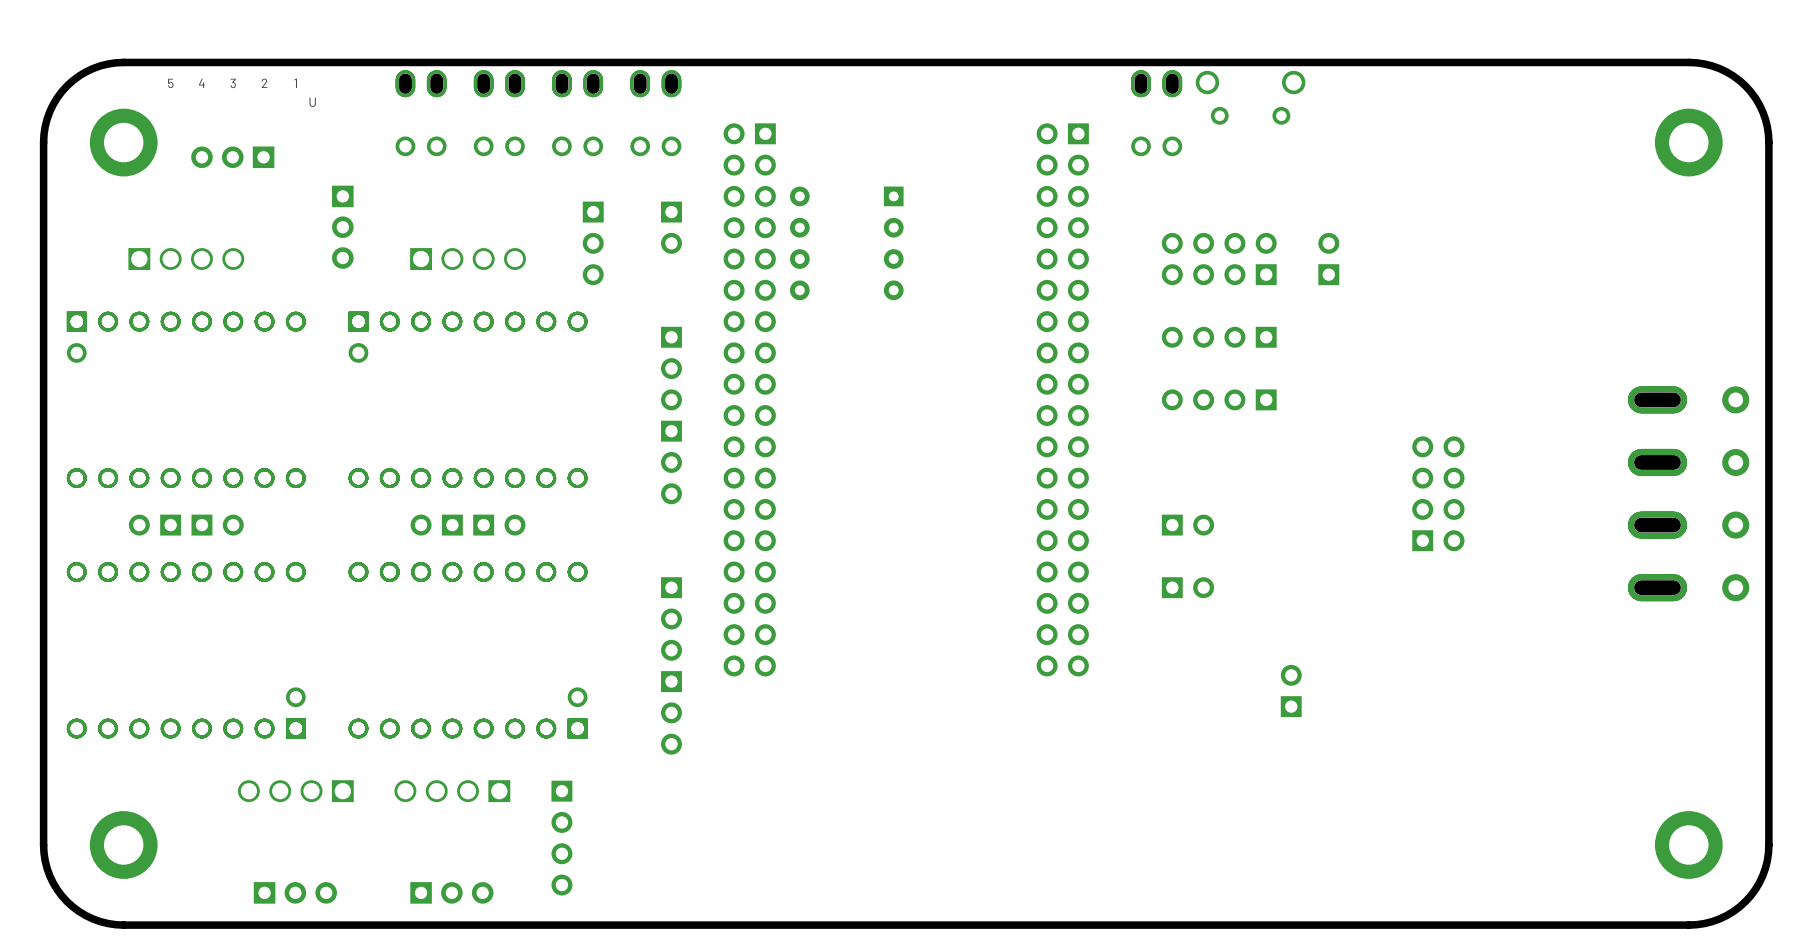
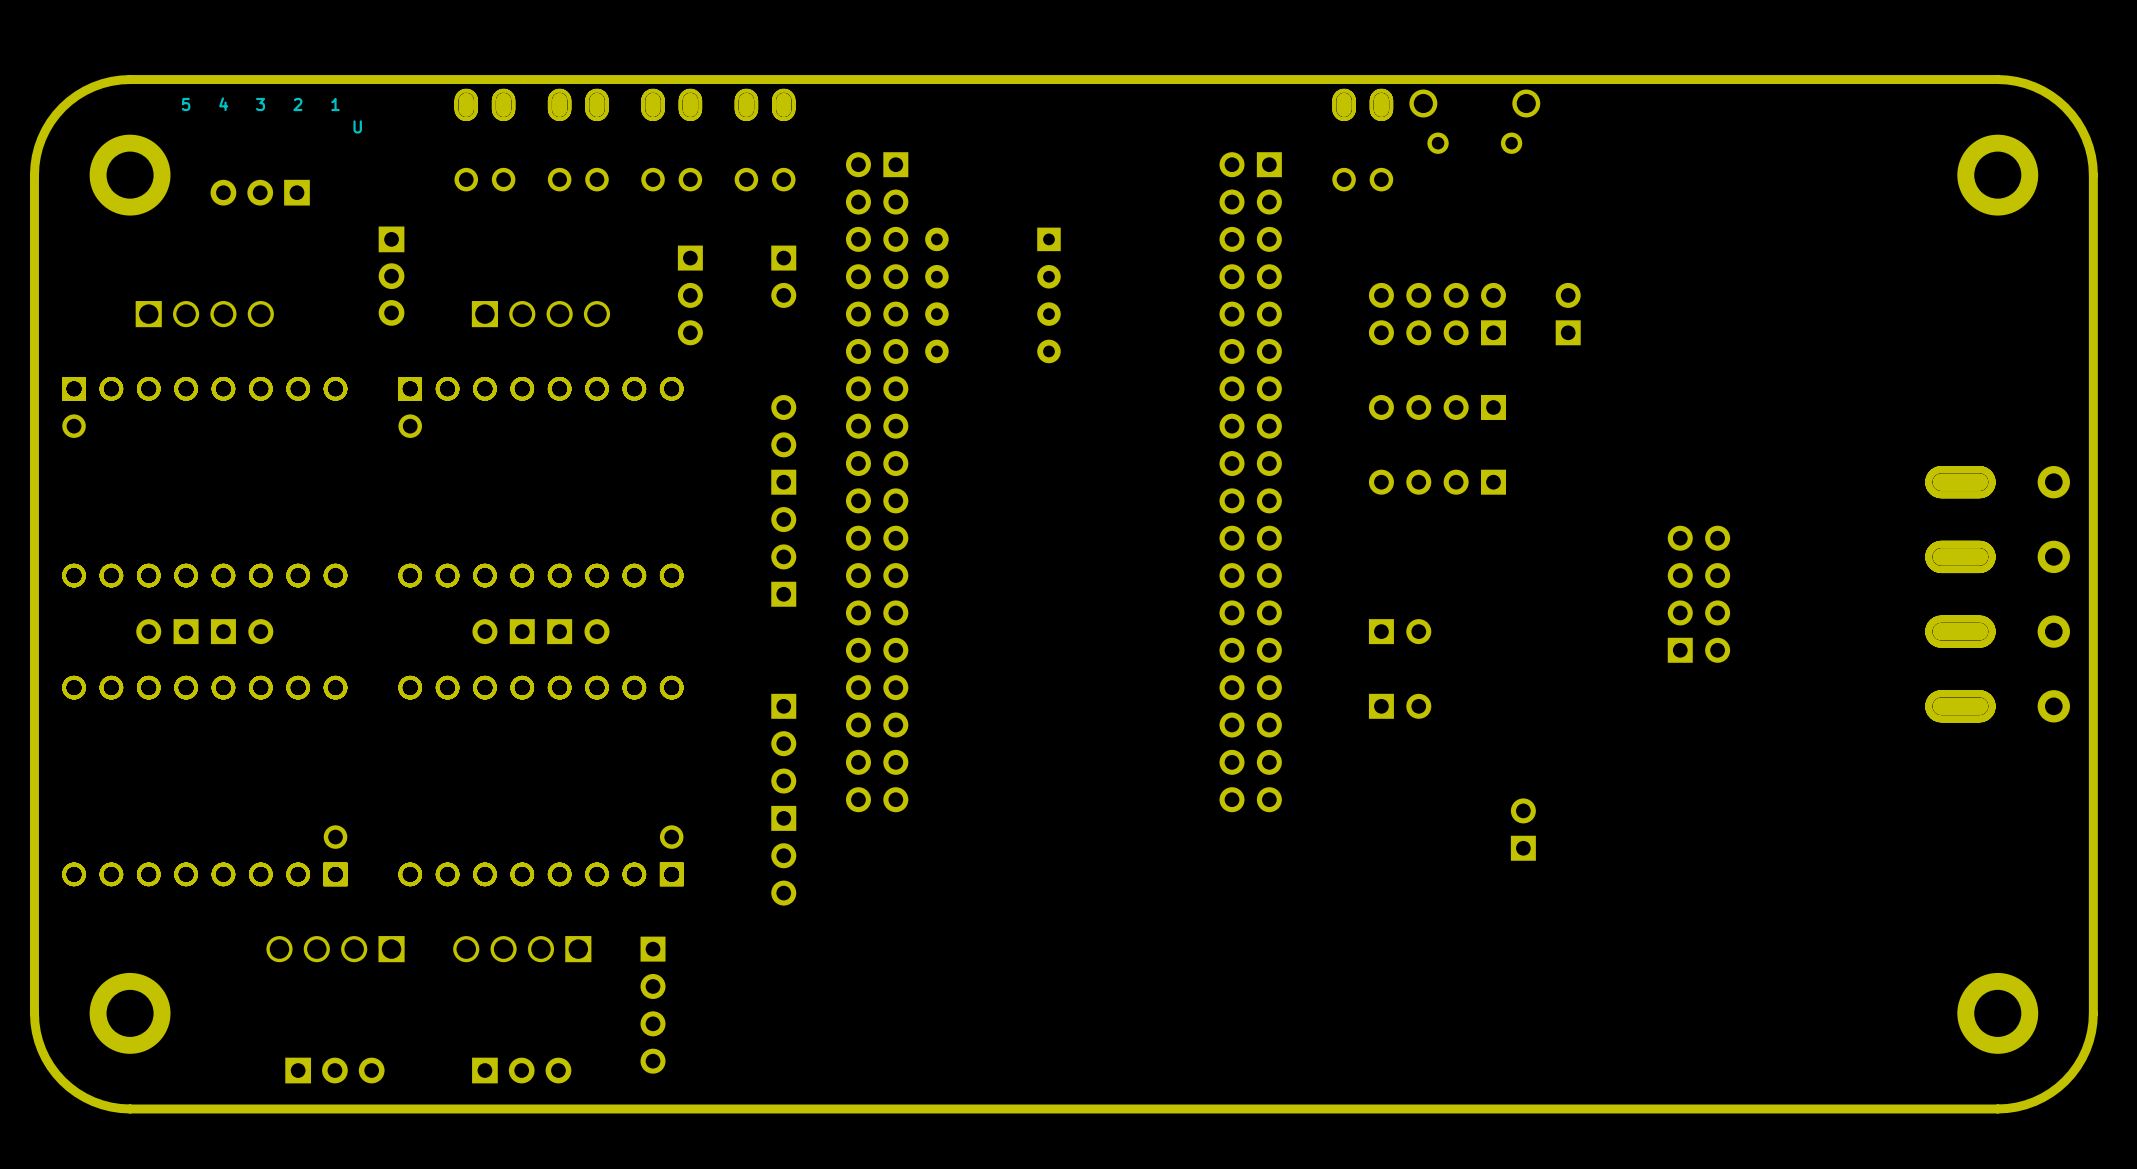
part rotation: 0° (671, 368) -> 180° (783, 444)
part rotation: 0° (671, 462) -> 180° (783, 556)

